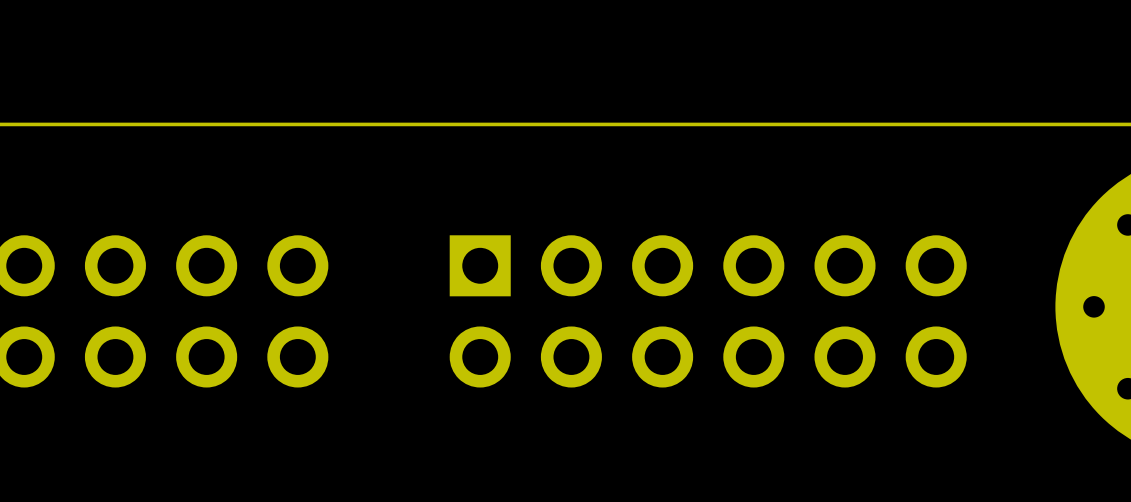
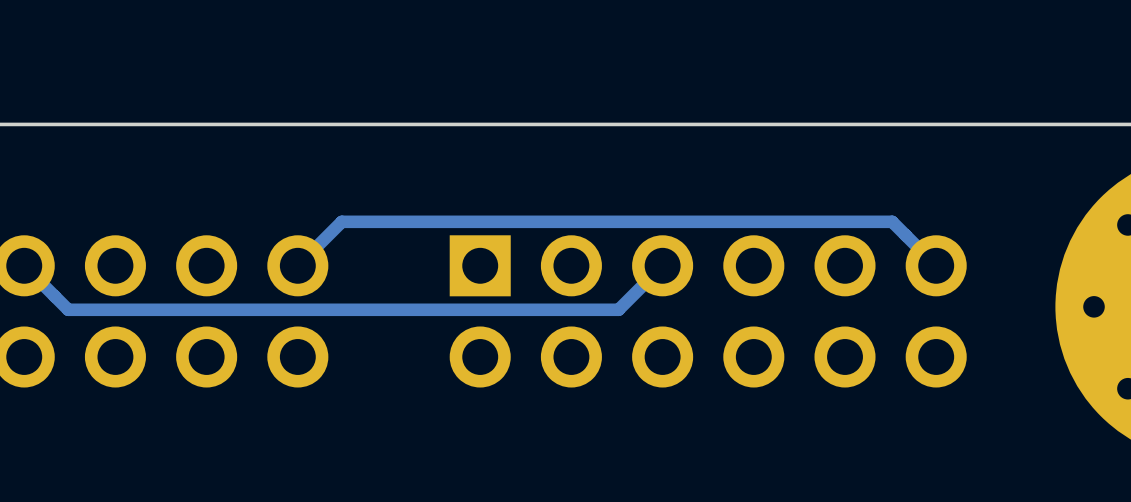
track: none -> (662, 265) (618, 309) (68, 309) (24, 265)
track: none -> (936, 265) (892, 221) (341, 221) (297, 265)

